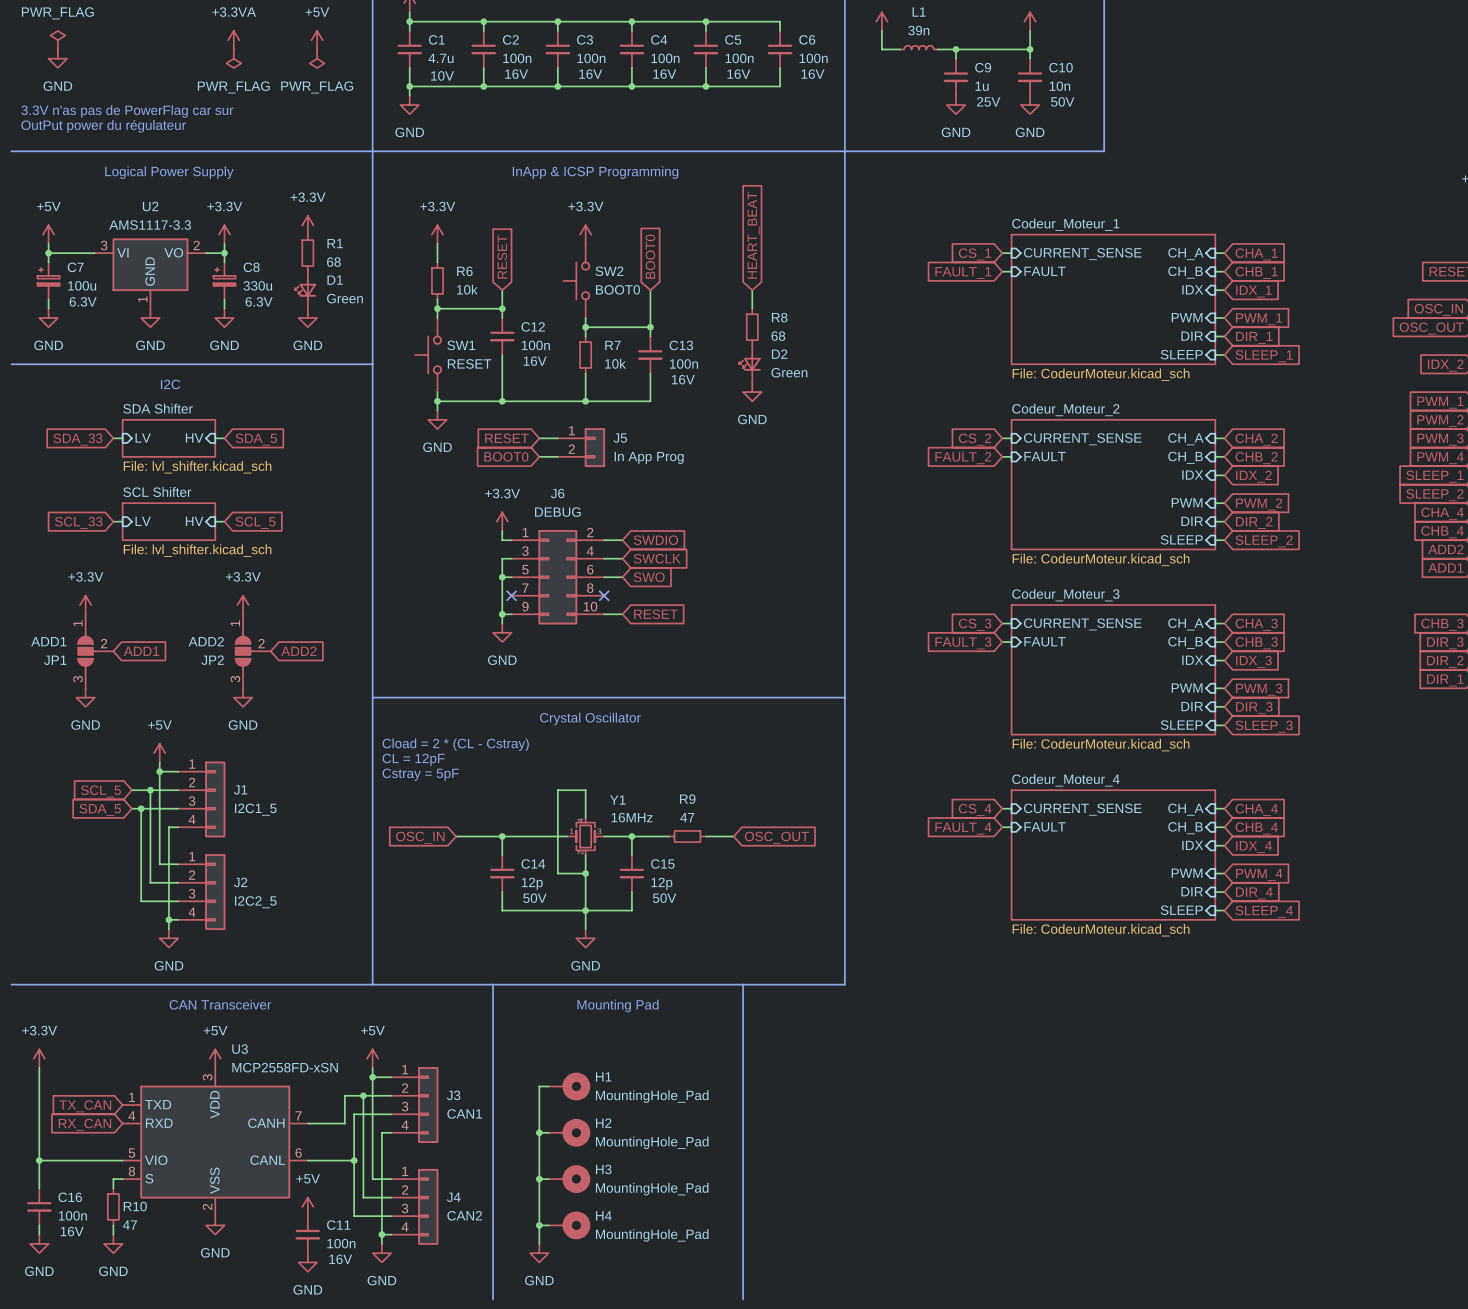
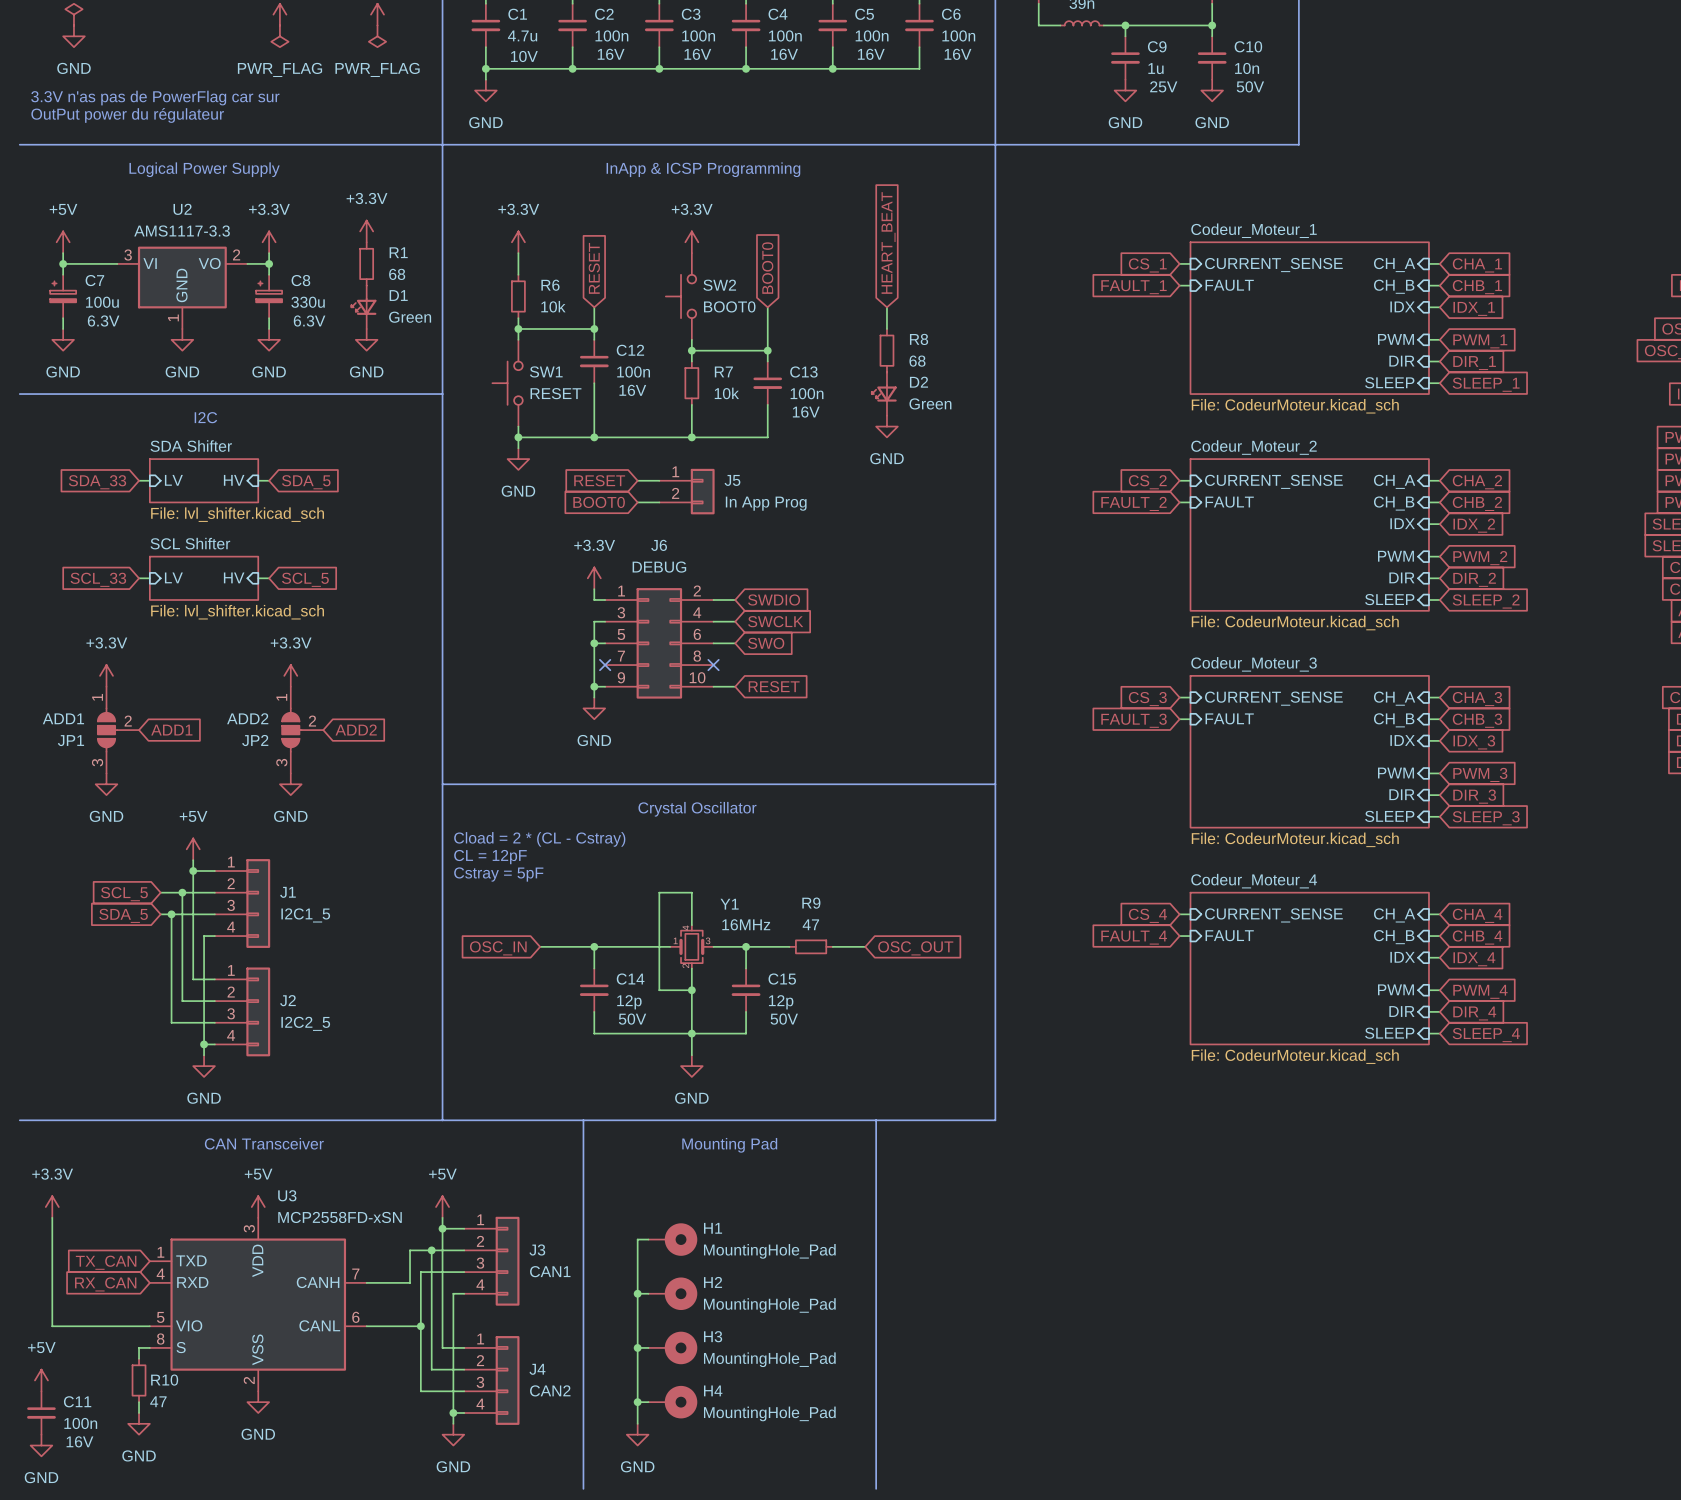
wire: (39, 1160) (39, 1188) -> none
junction: (39, 1160) -> none
power symbol: none -> +5V (41, 1380)
C16: 100n (39, 1206) -> none
power symbol: +5V (307, 1206) -> none
wire: (39, 1225) (39, 1234) -> none
C11 position: (307, 1234) -> (41, 1412)
power symbol position: GND (39, 1243) -> GND (41, 1445)
power symbol: GND (307, 1262) -> none

